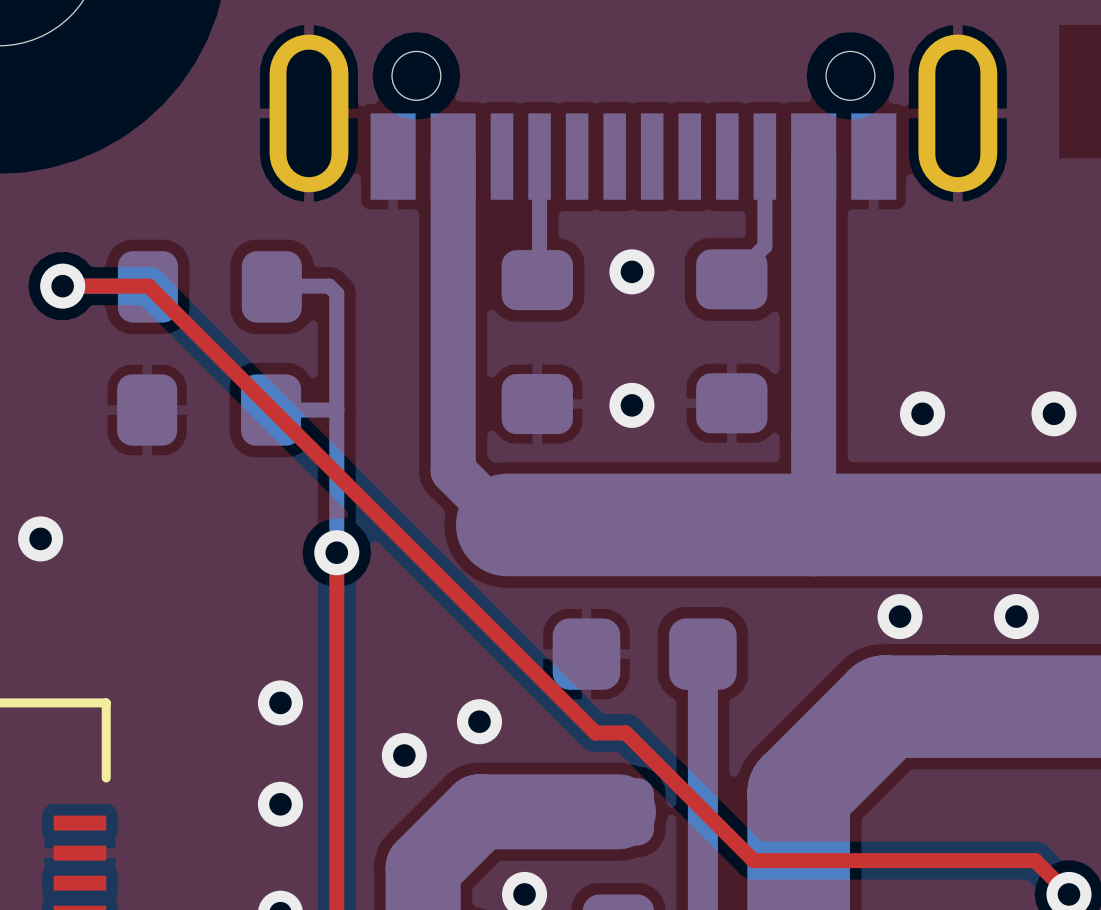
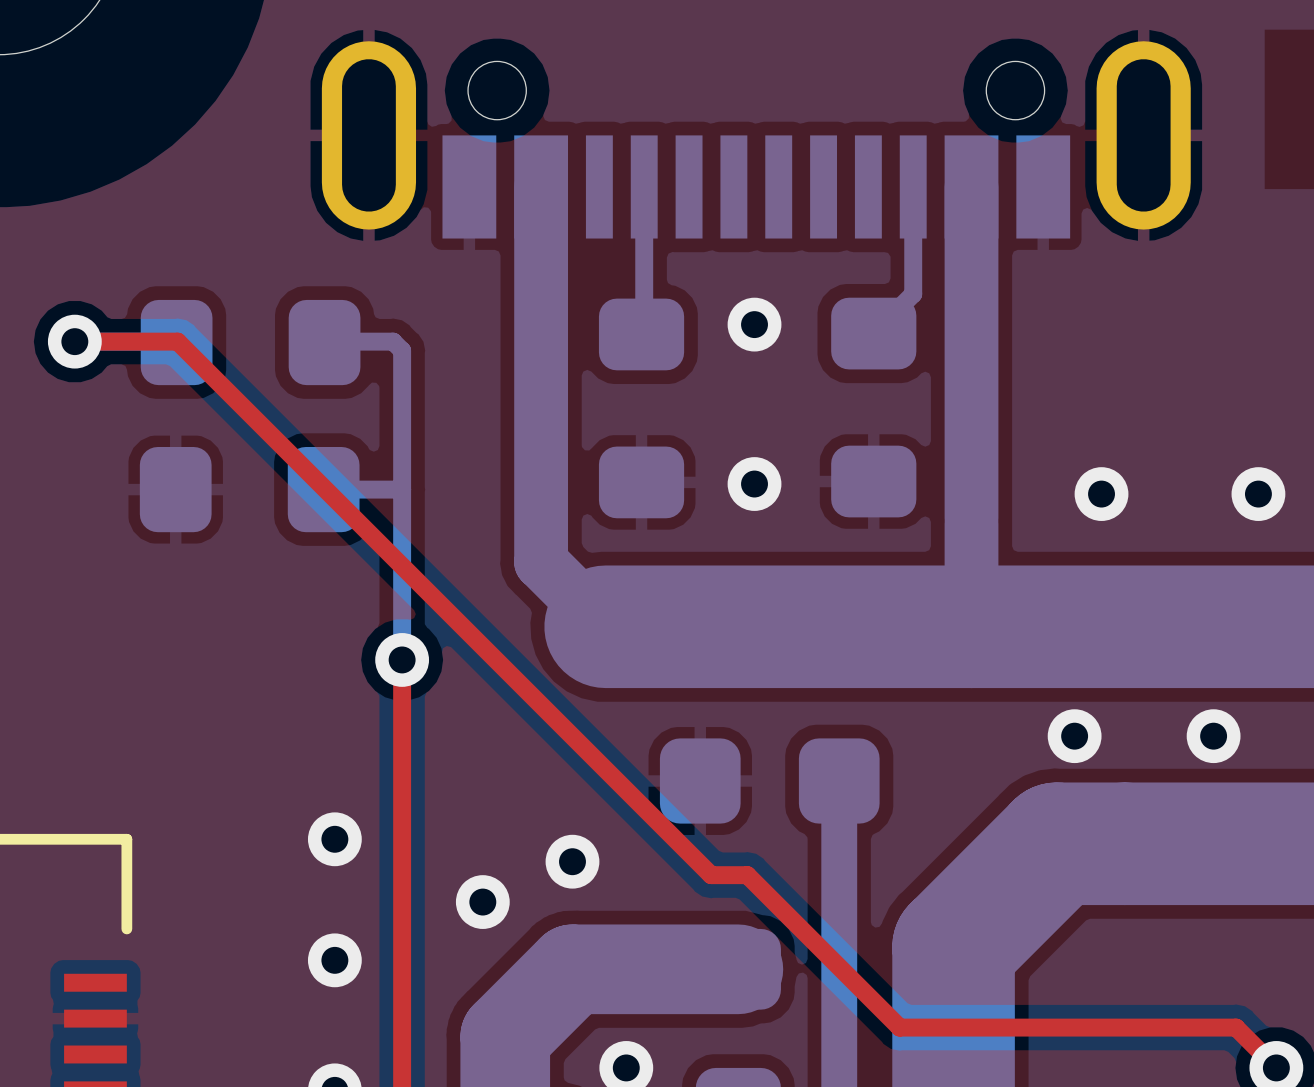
via: (40, 538) -> none

